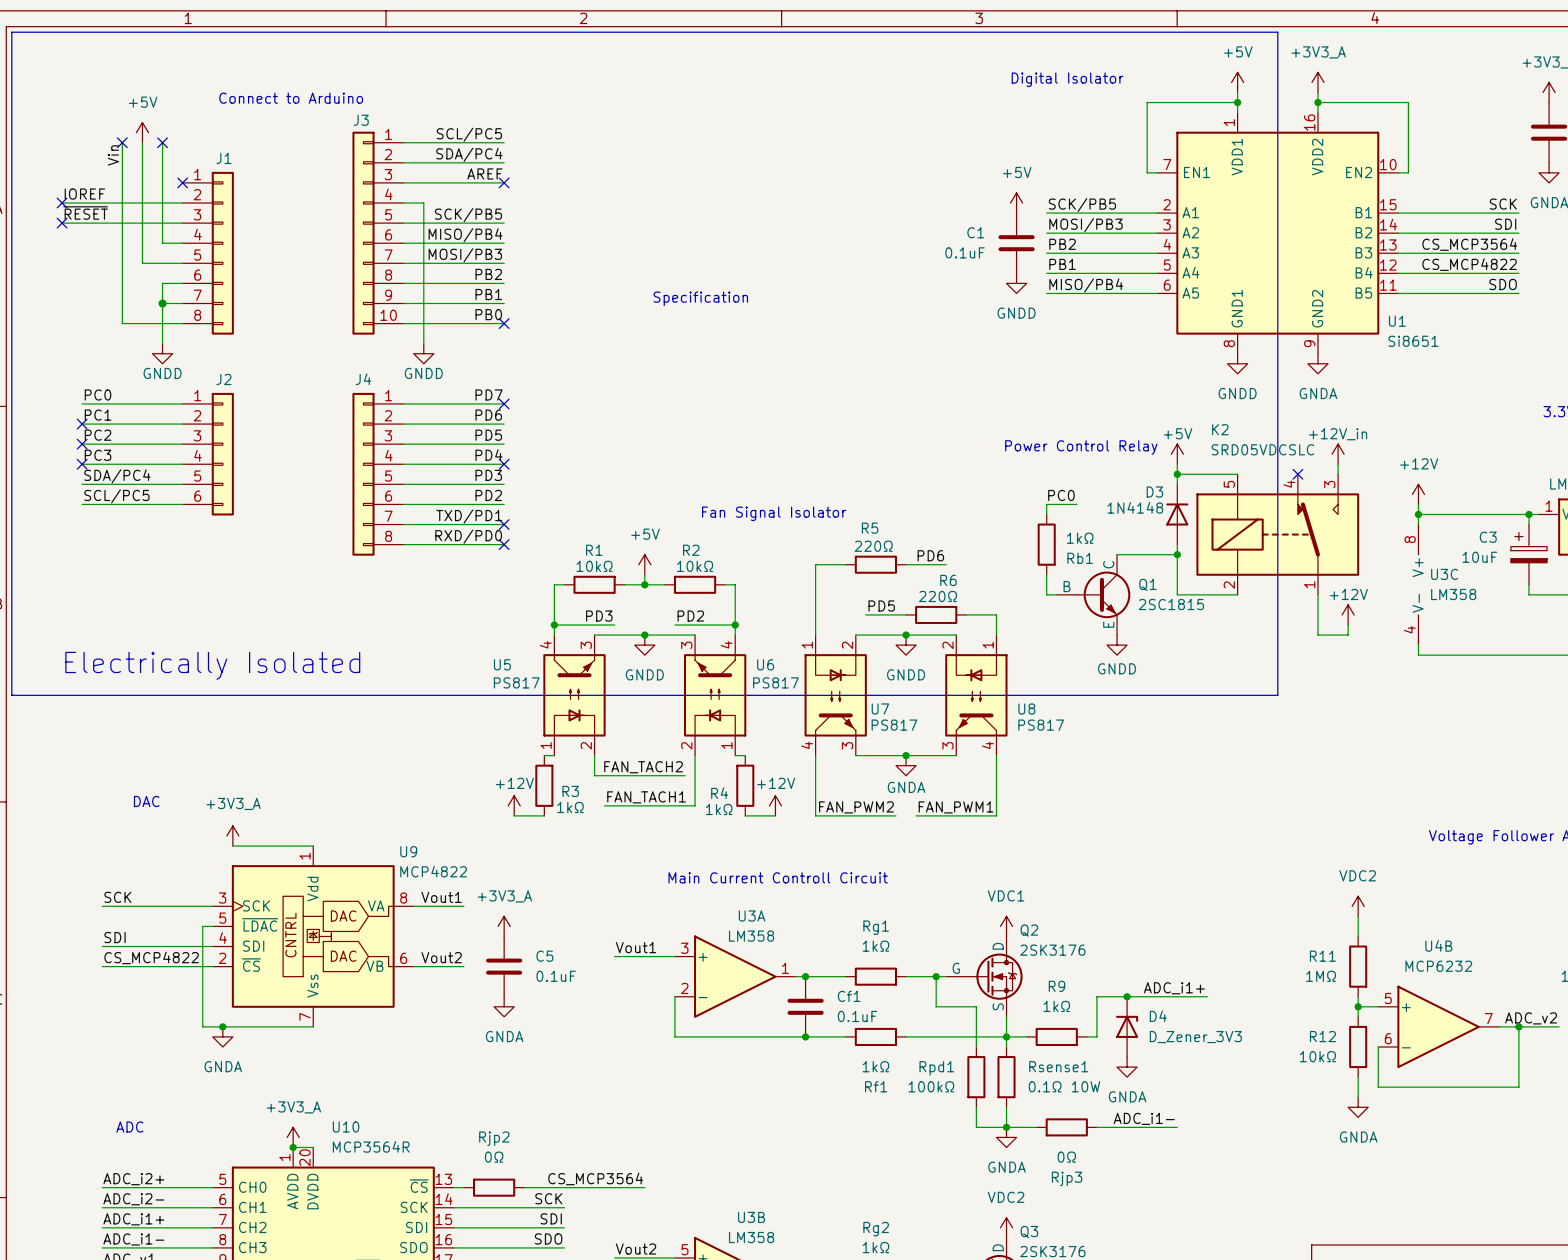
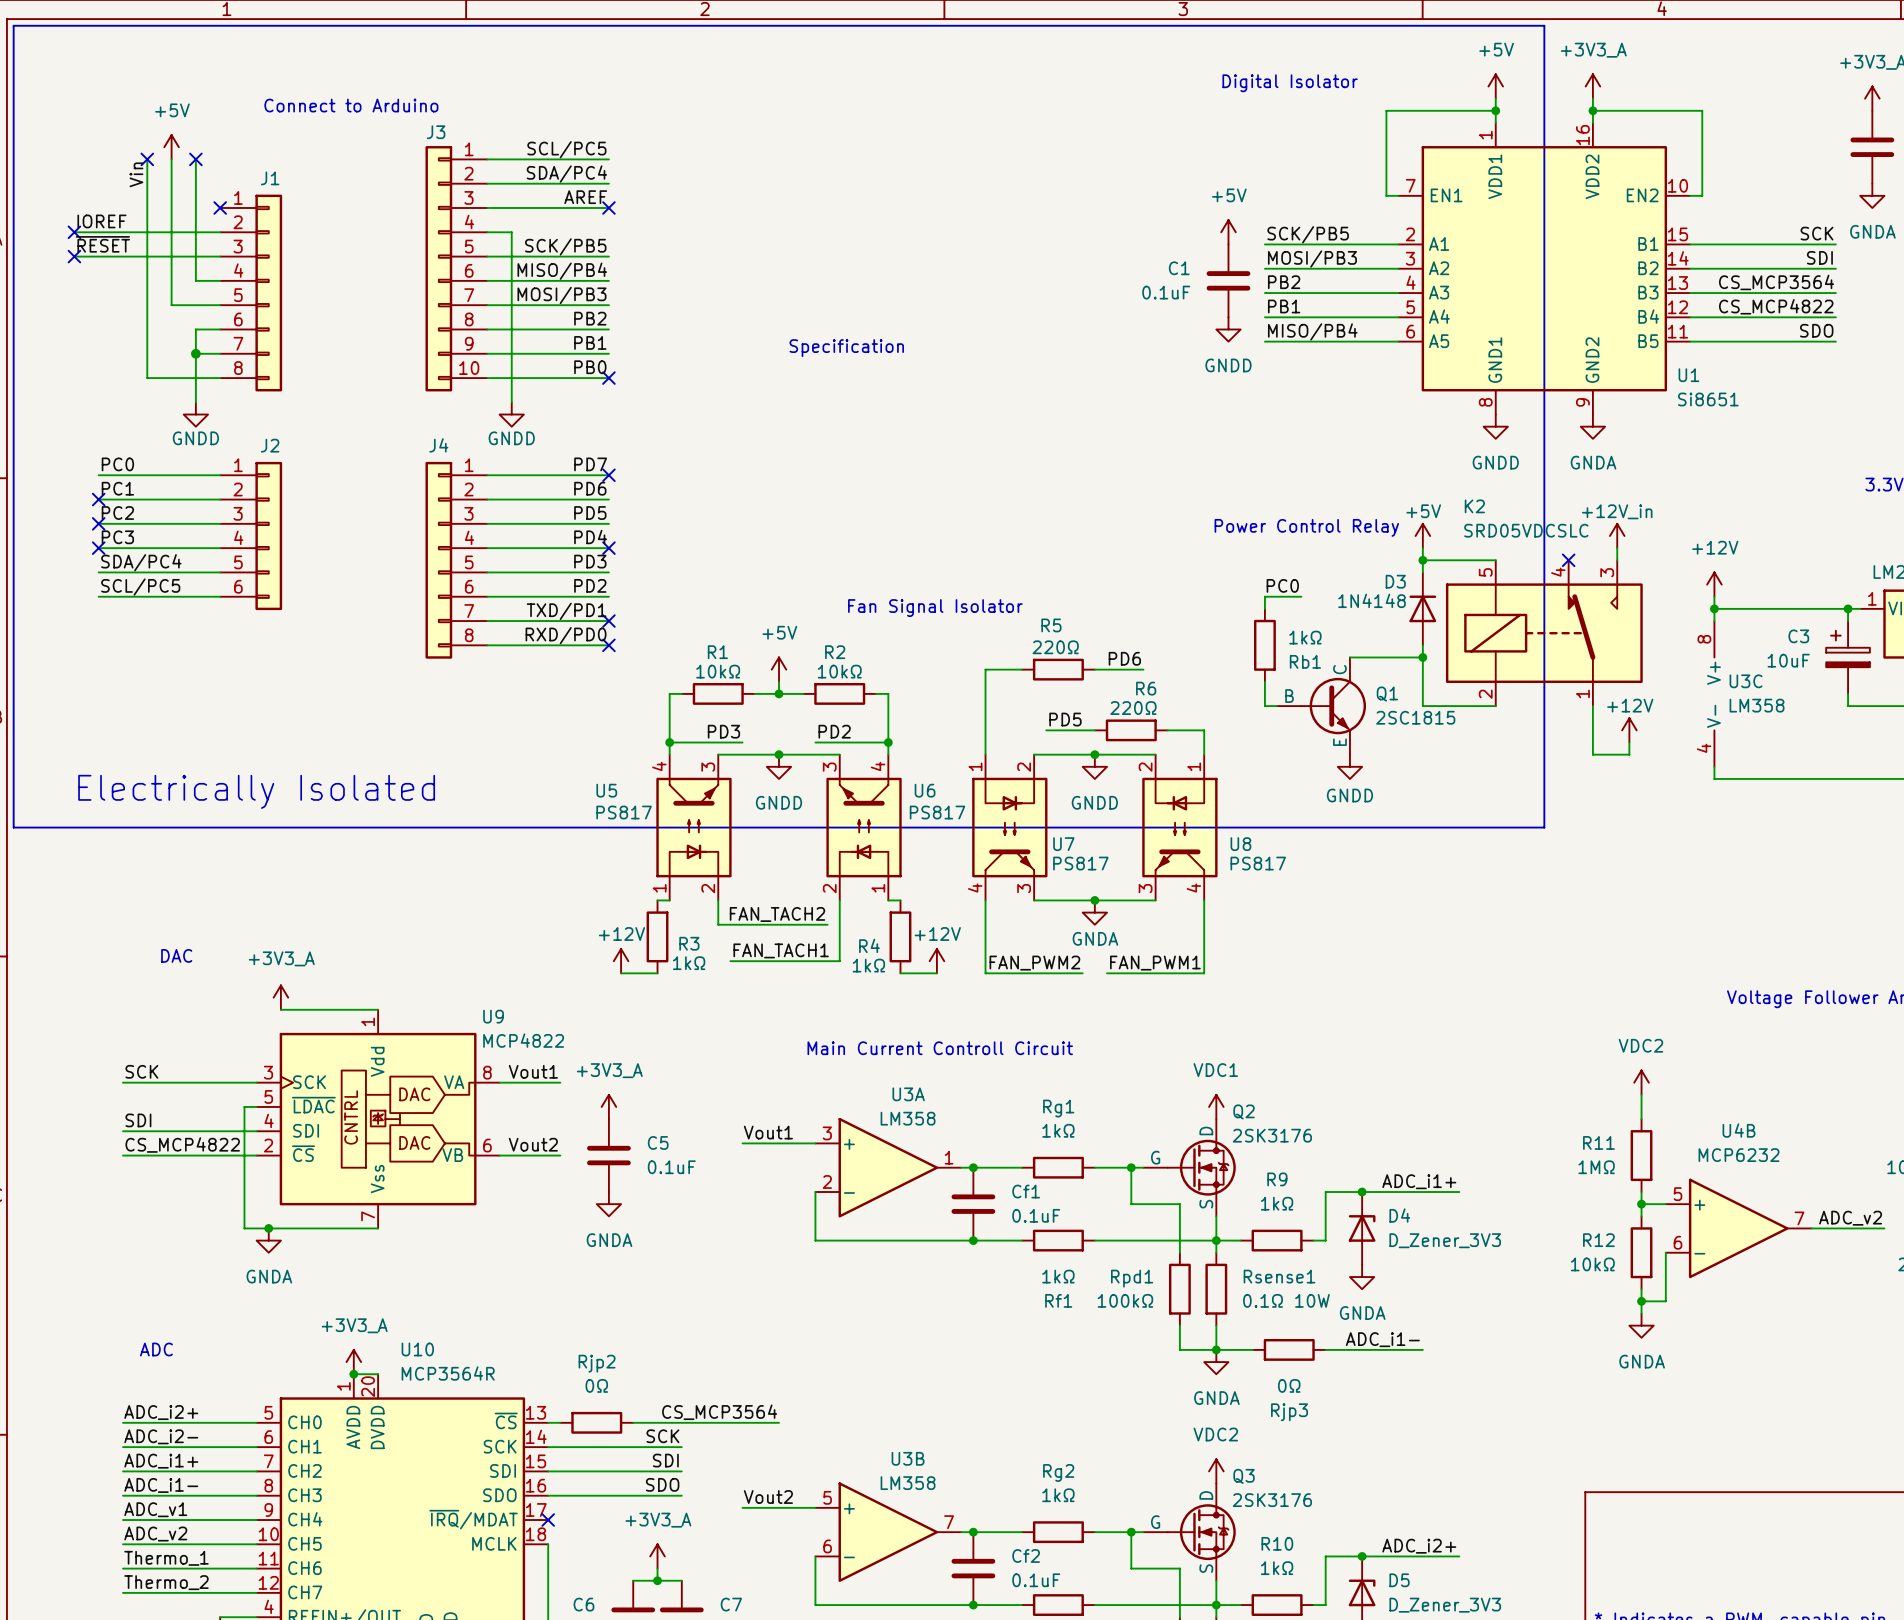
wire: (1518, 1026) (1518, 1087) (1378, 1087) -> (1641, 1301) (1665, 1301)
junction: (1518, 1026) -> none
junction: none -> (1641, 1301)

